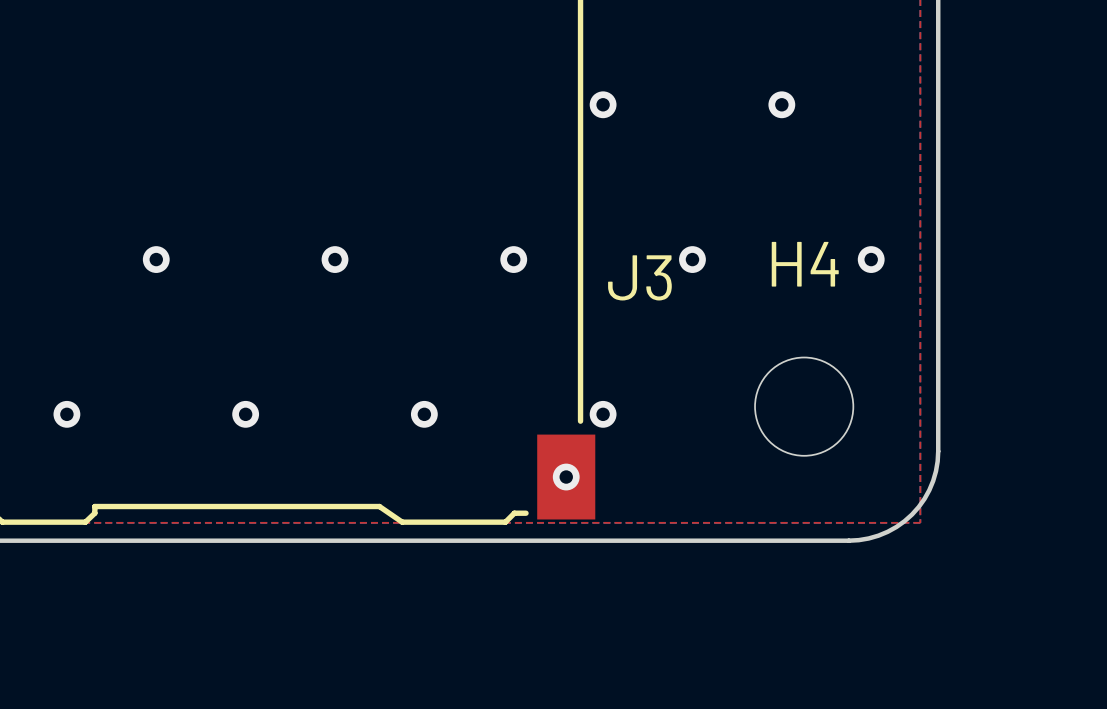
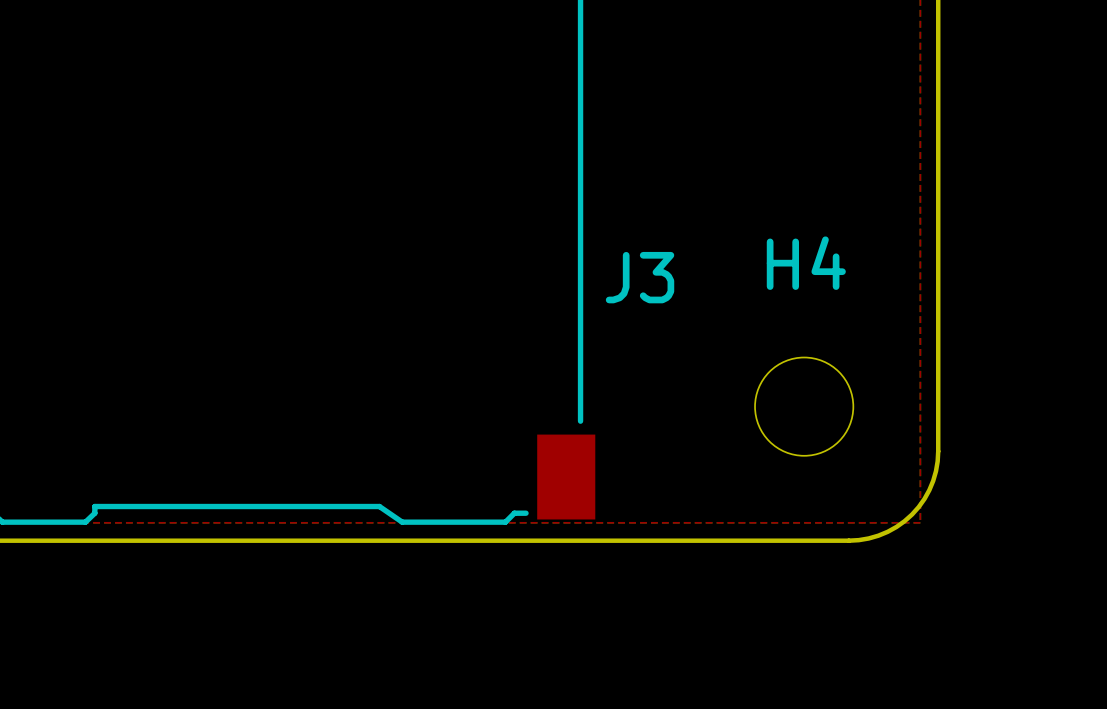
via: (603, 104) -> none
via: (781, 104) -> none
via: (156, 259) -> none
via: (335, 259) -> none
via: (513, 259) -> none
via: (692, 259) -> none
via: (871, 259) -> none
via: (66, 414) -> none
via: (245, 414) -> none
via: (424, 414) -> none
via: (603, 414) -> none
via: (566, 477) -> none

